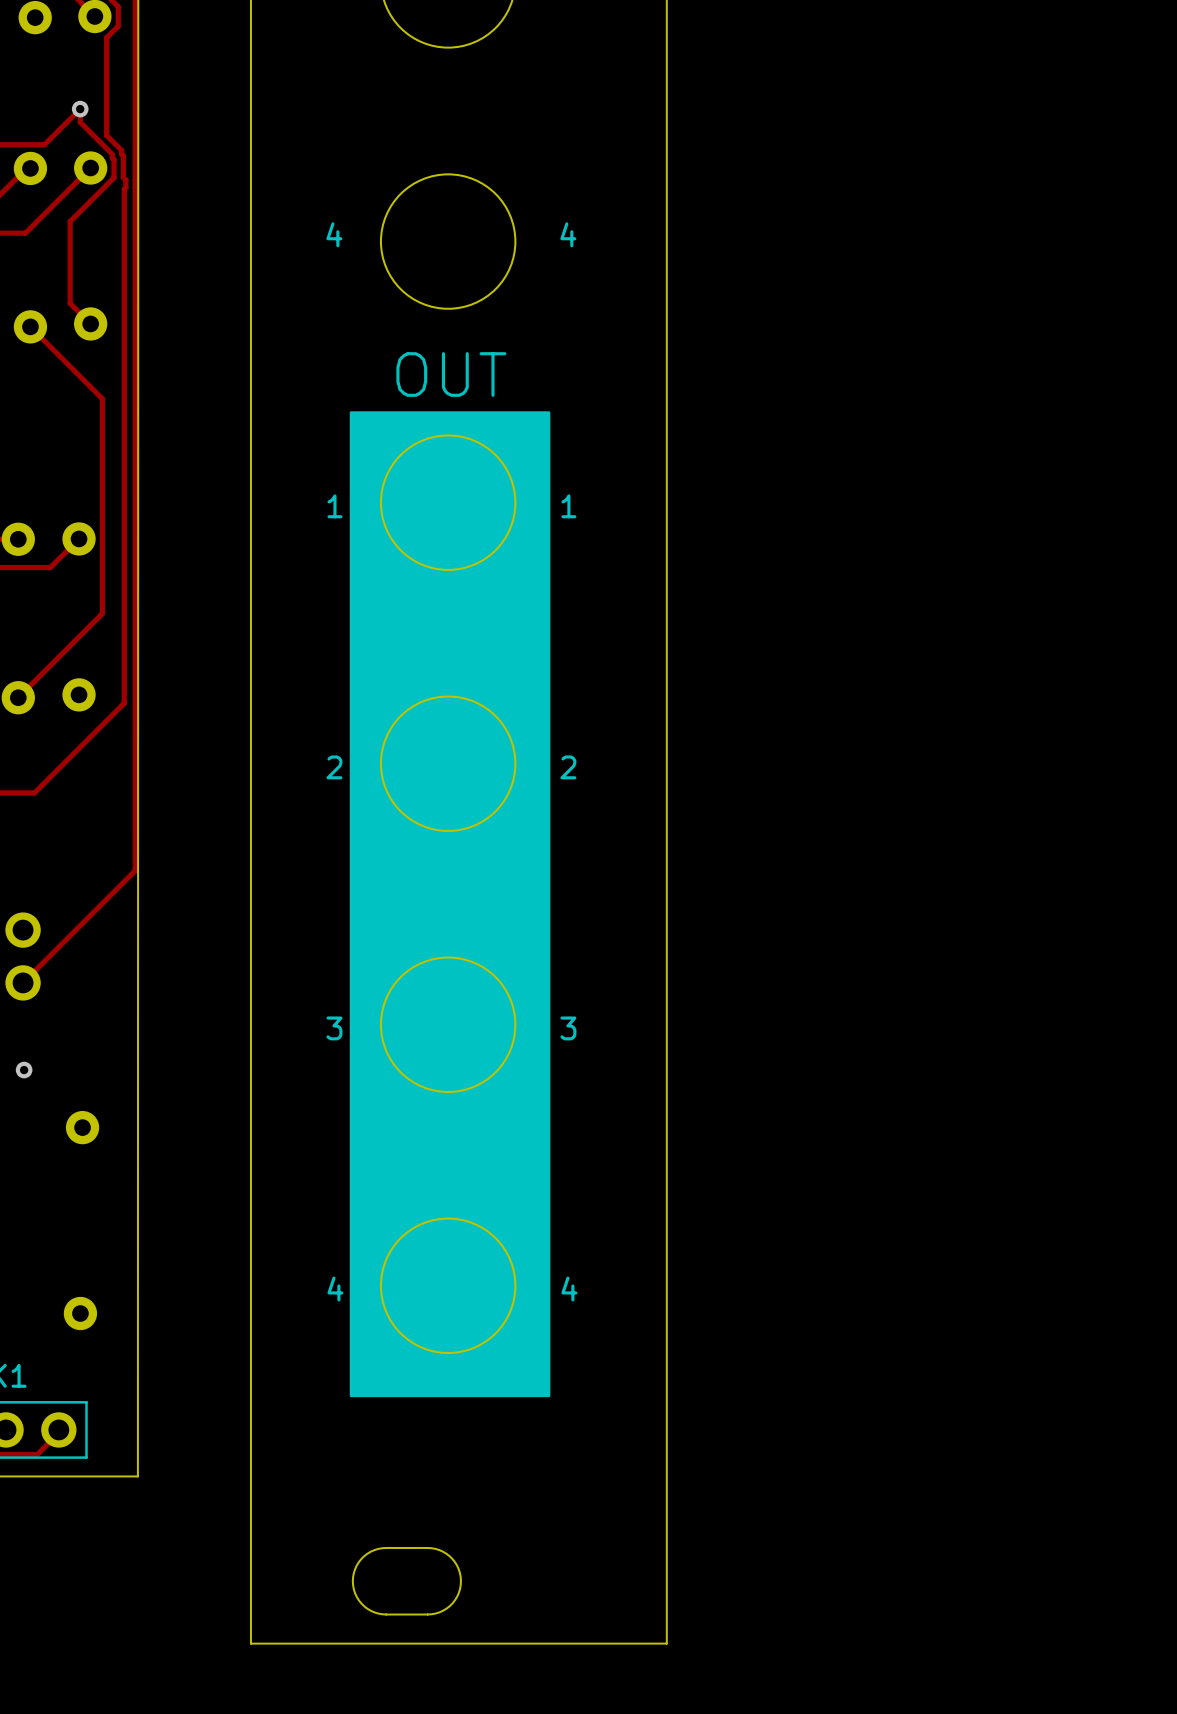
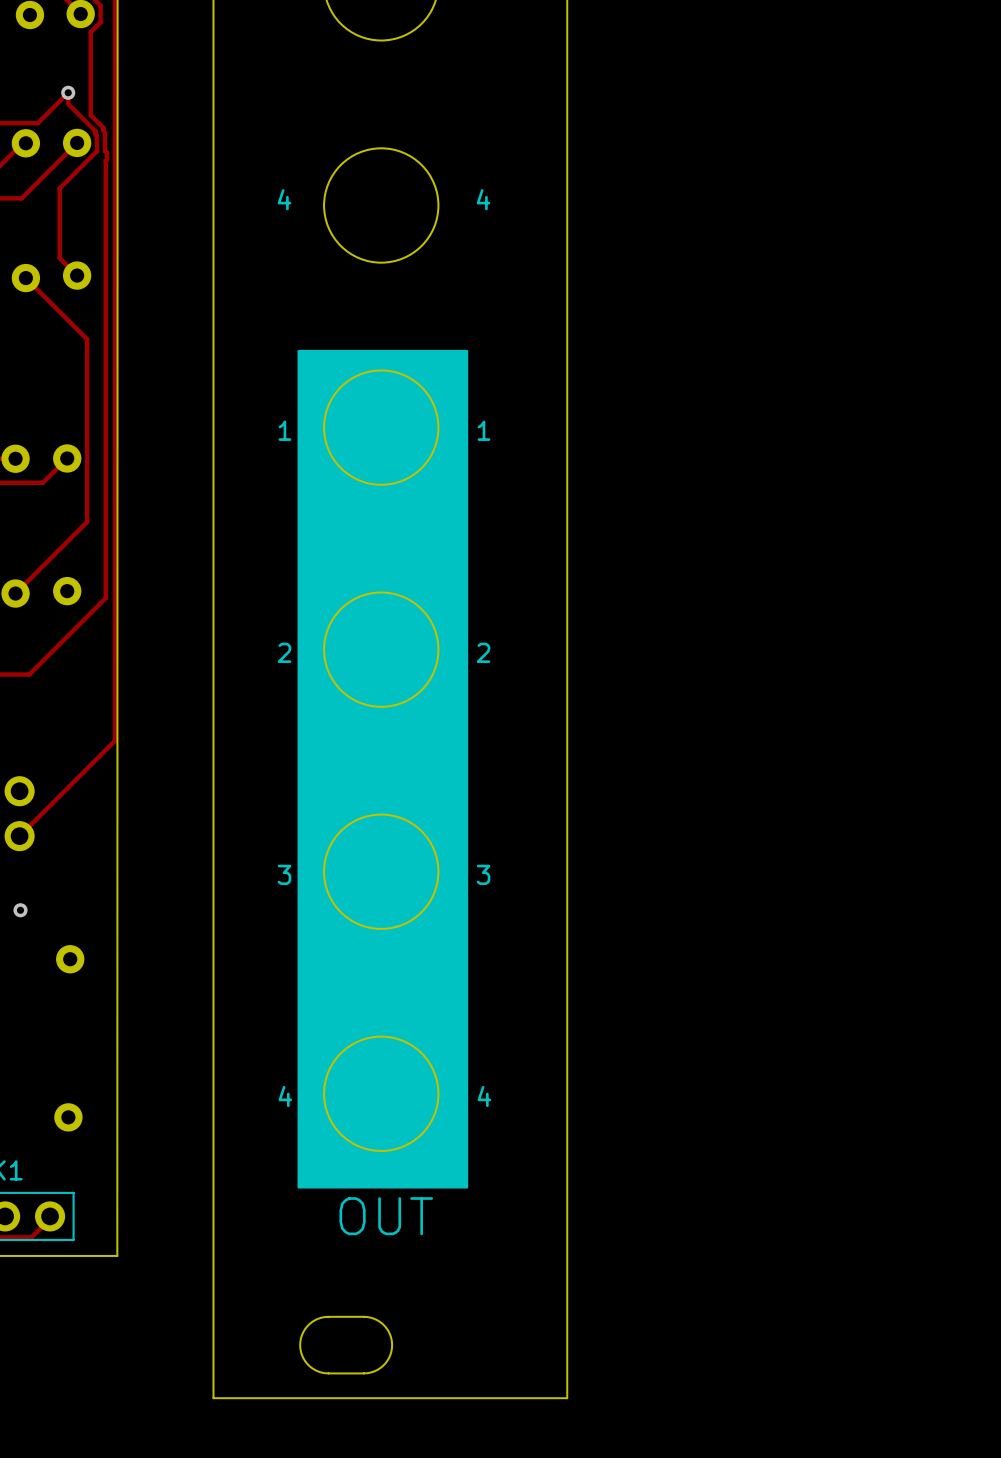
text: OUT (451, 374) -> none
text: none -> OUT (386, 1216)

